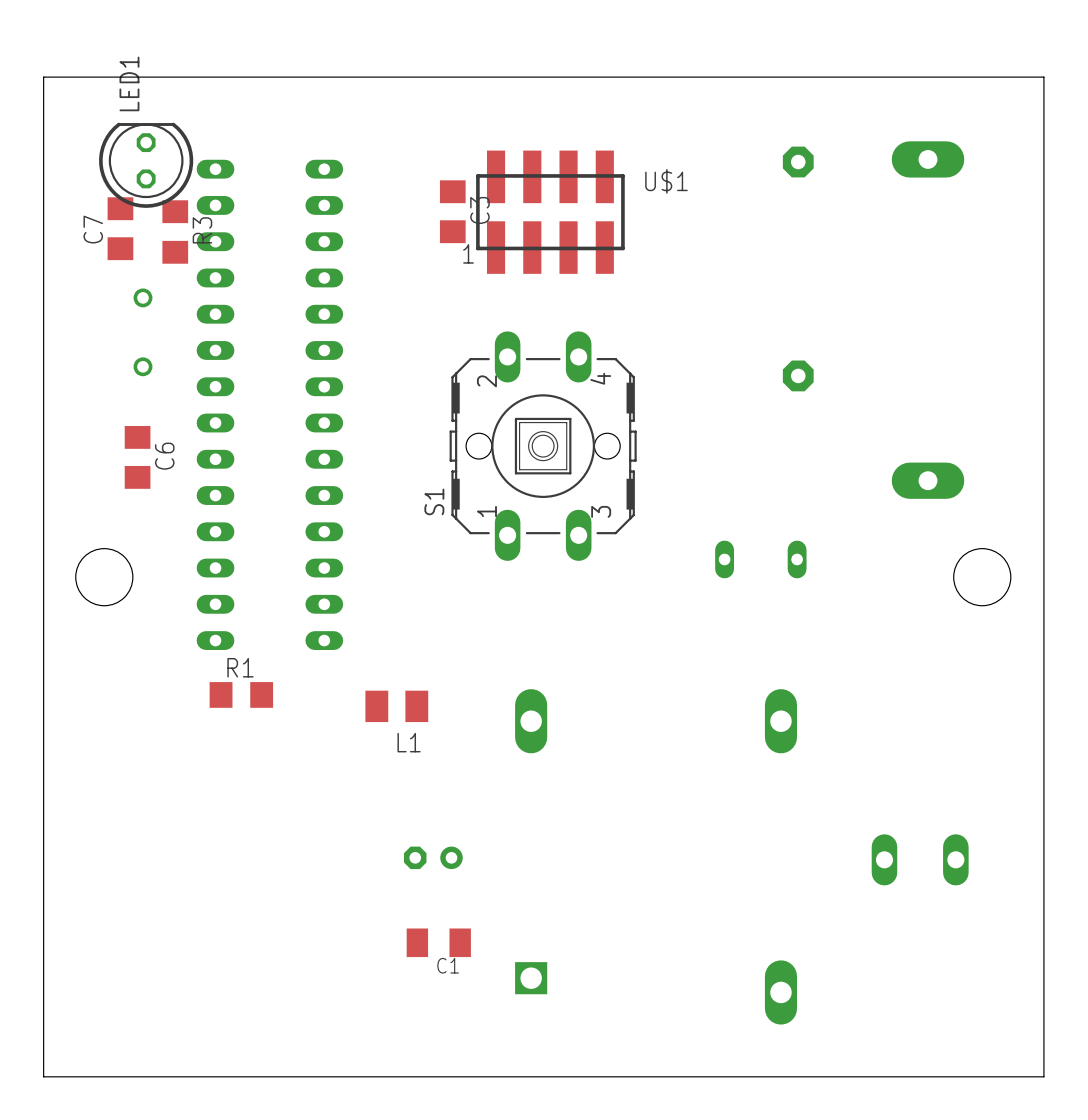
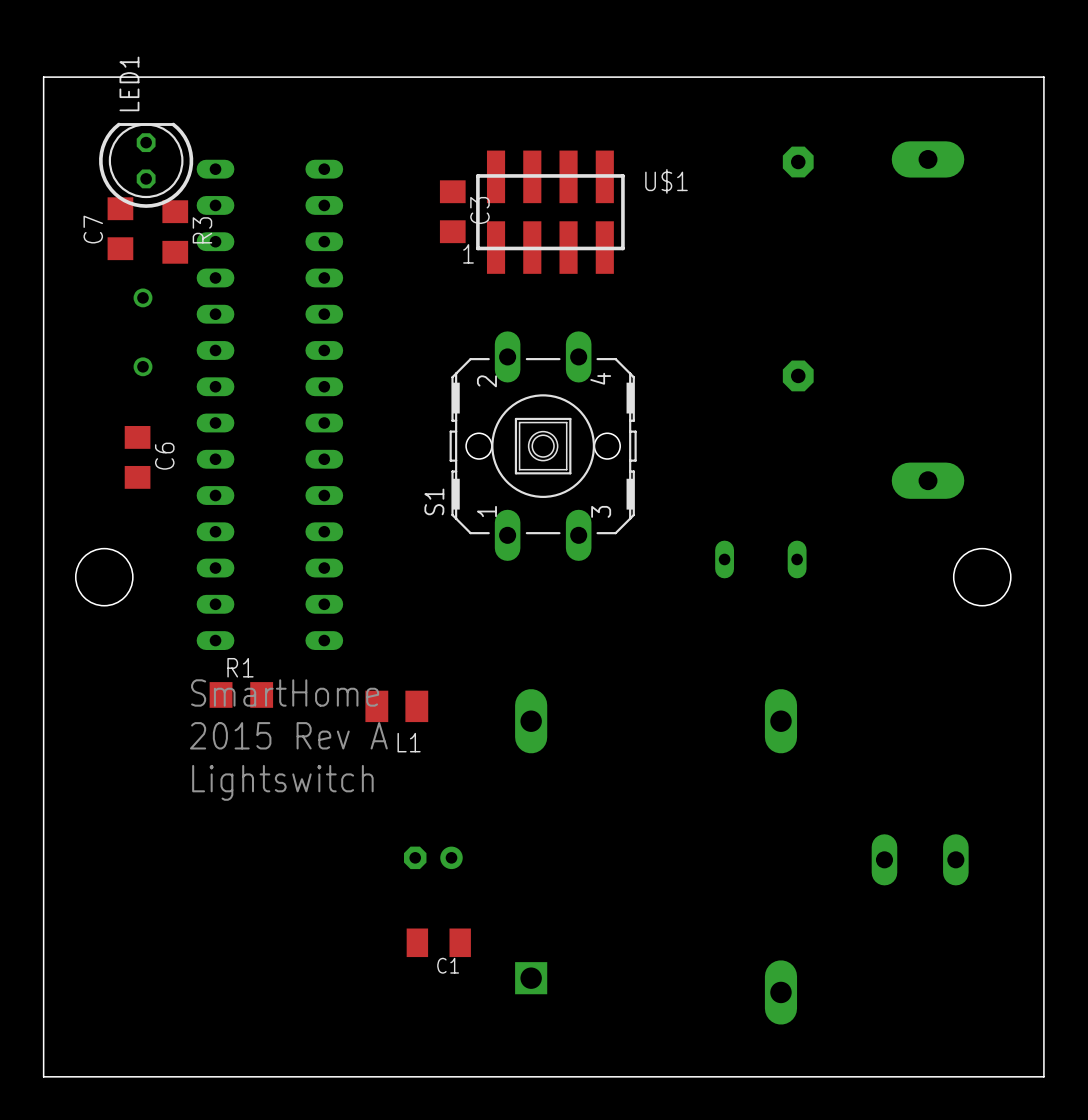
text: none -> SmartHome (285, 692)
text: none -> 2015 Rev A (288, 735)
text: none -> Lightswitch (282, 782)

